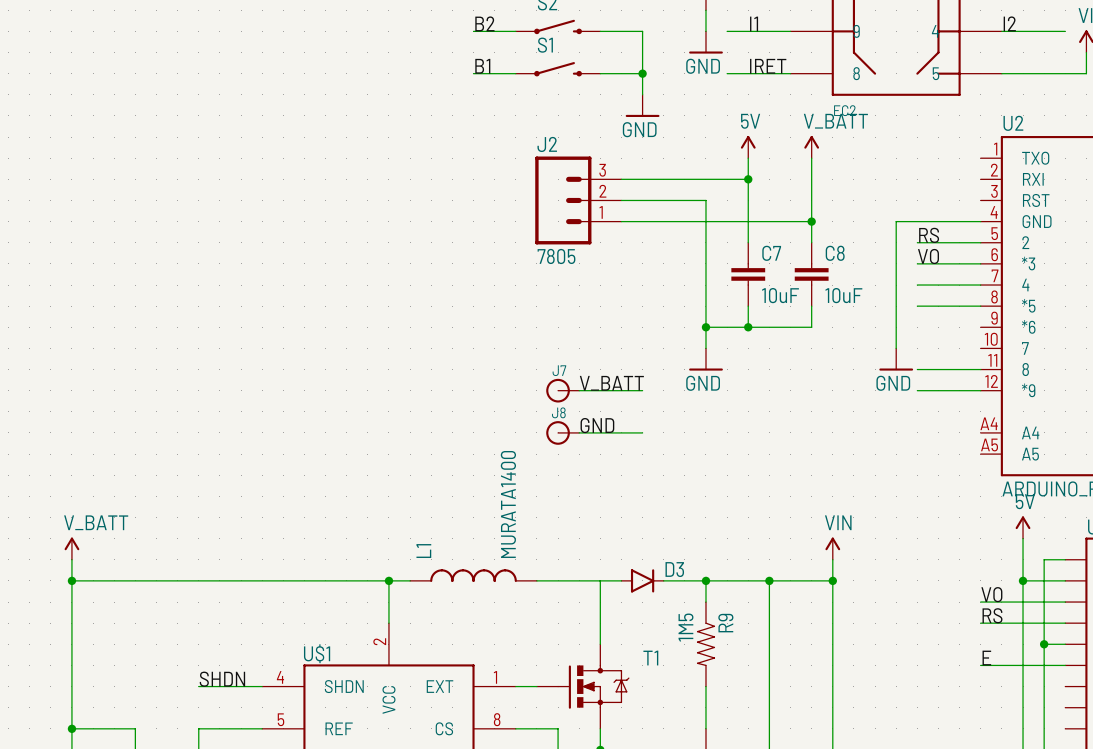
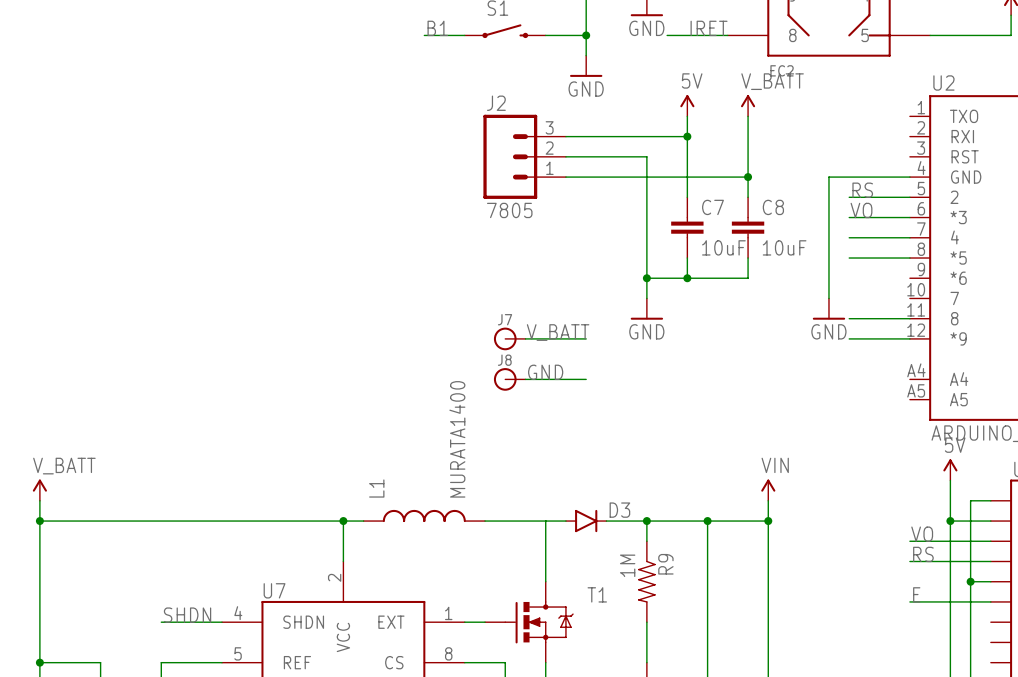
R9 value: 1M5 (685, 627) -> 1M (627, 565)
U$1 name: U$1 (317, 653) -> U7 (274, 590)

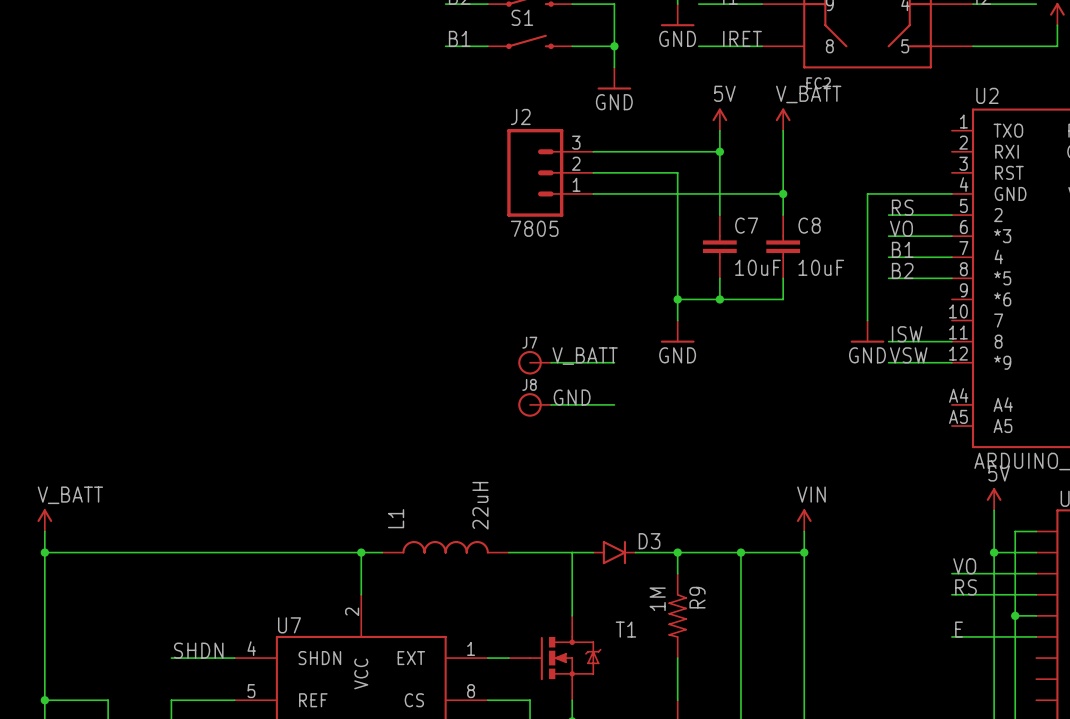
label: none -> B1 (902, 249)
label: none -> B2 (902, 270)
label: none -> ISW (907, 334)
label: none -> VSW (908, 355)
L1 value: MURATA1400 (457, 439) -> 22uH (480, 505)

